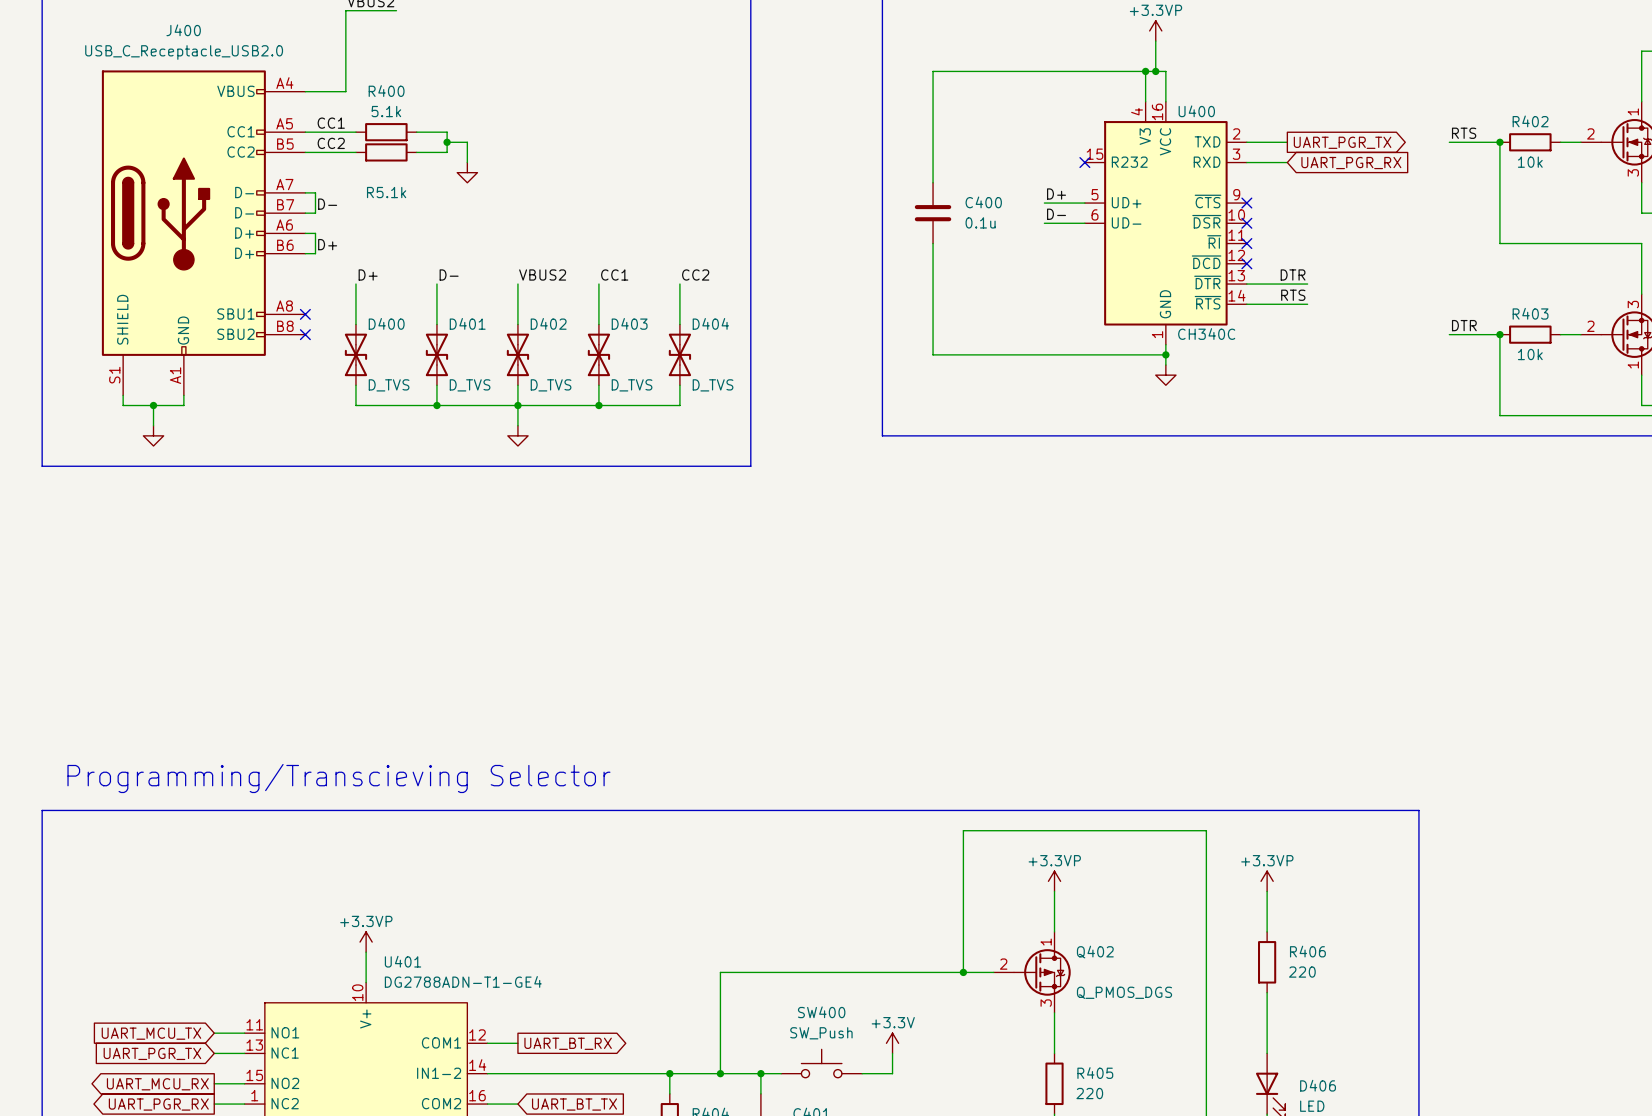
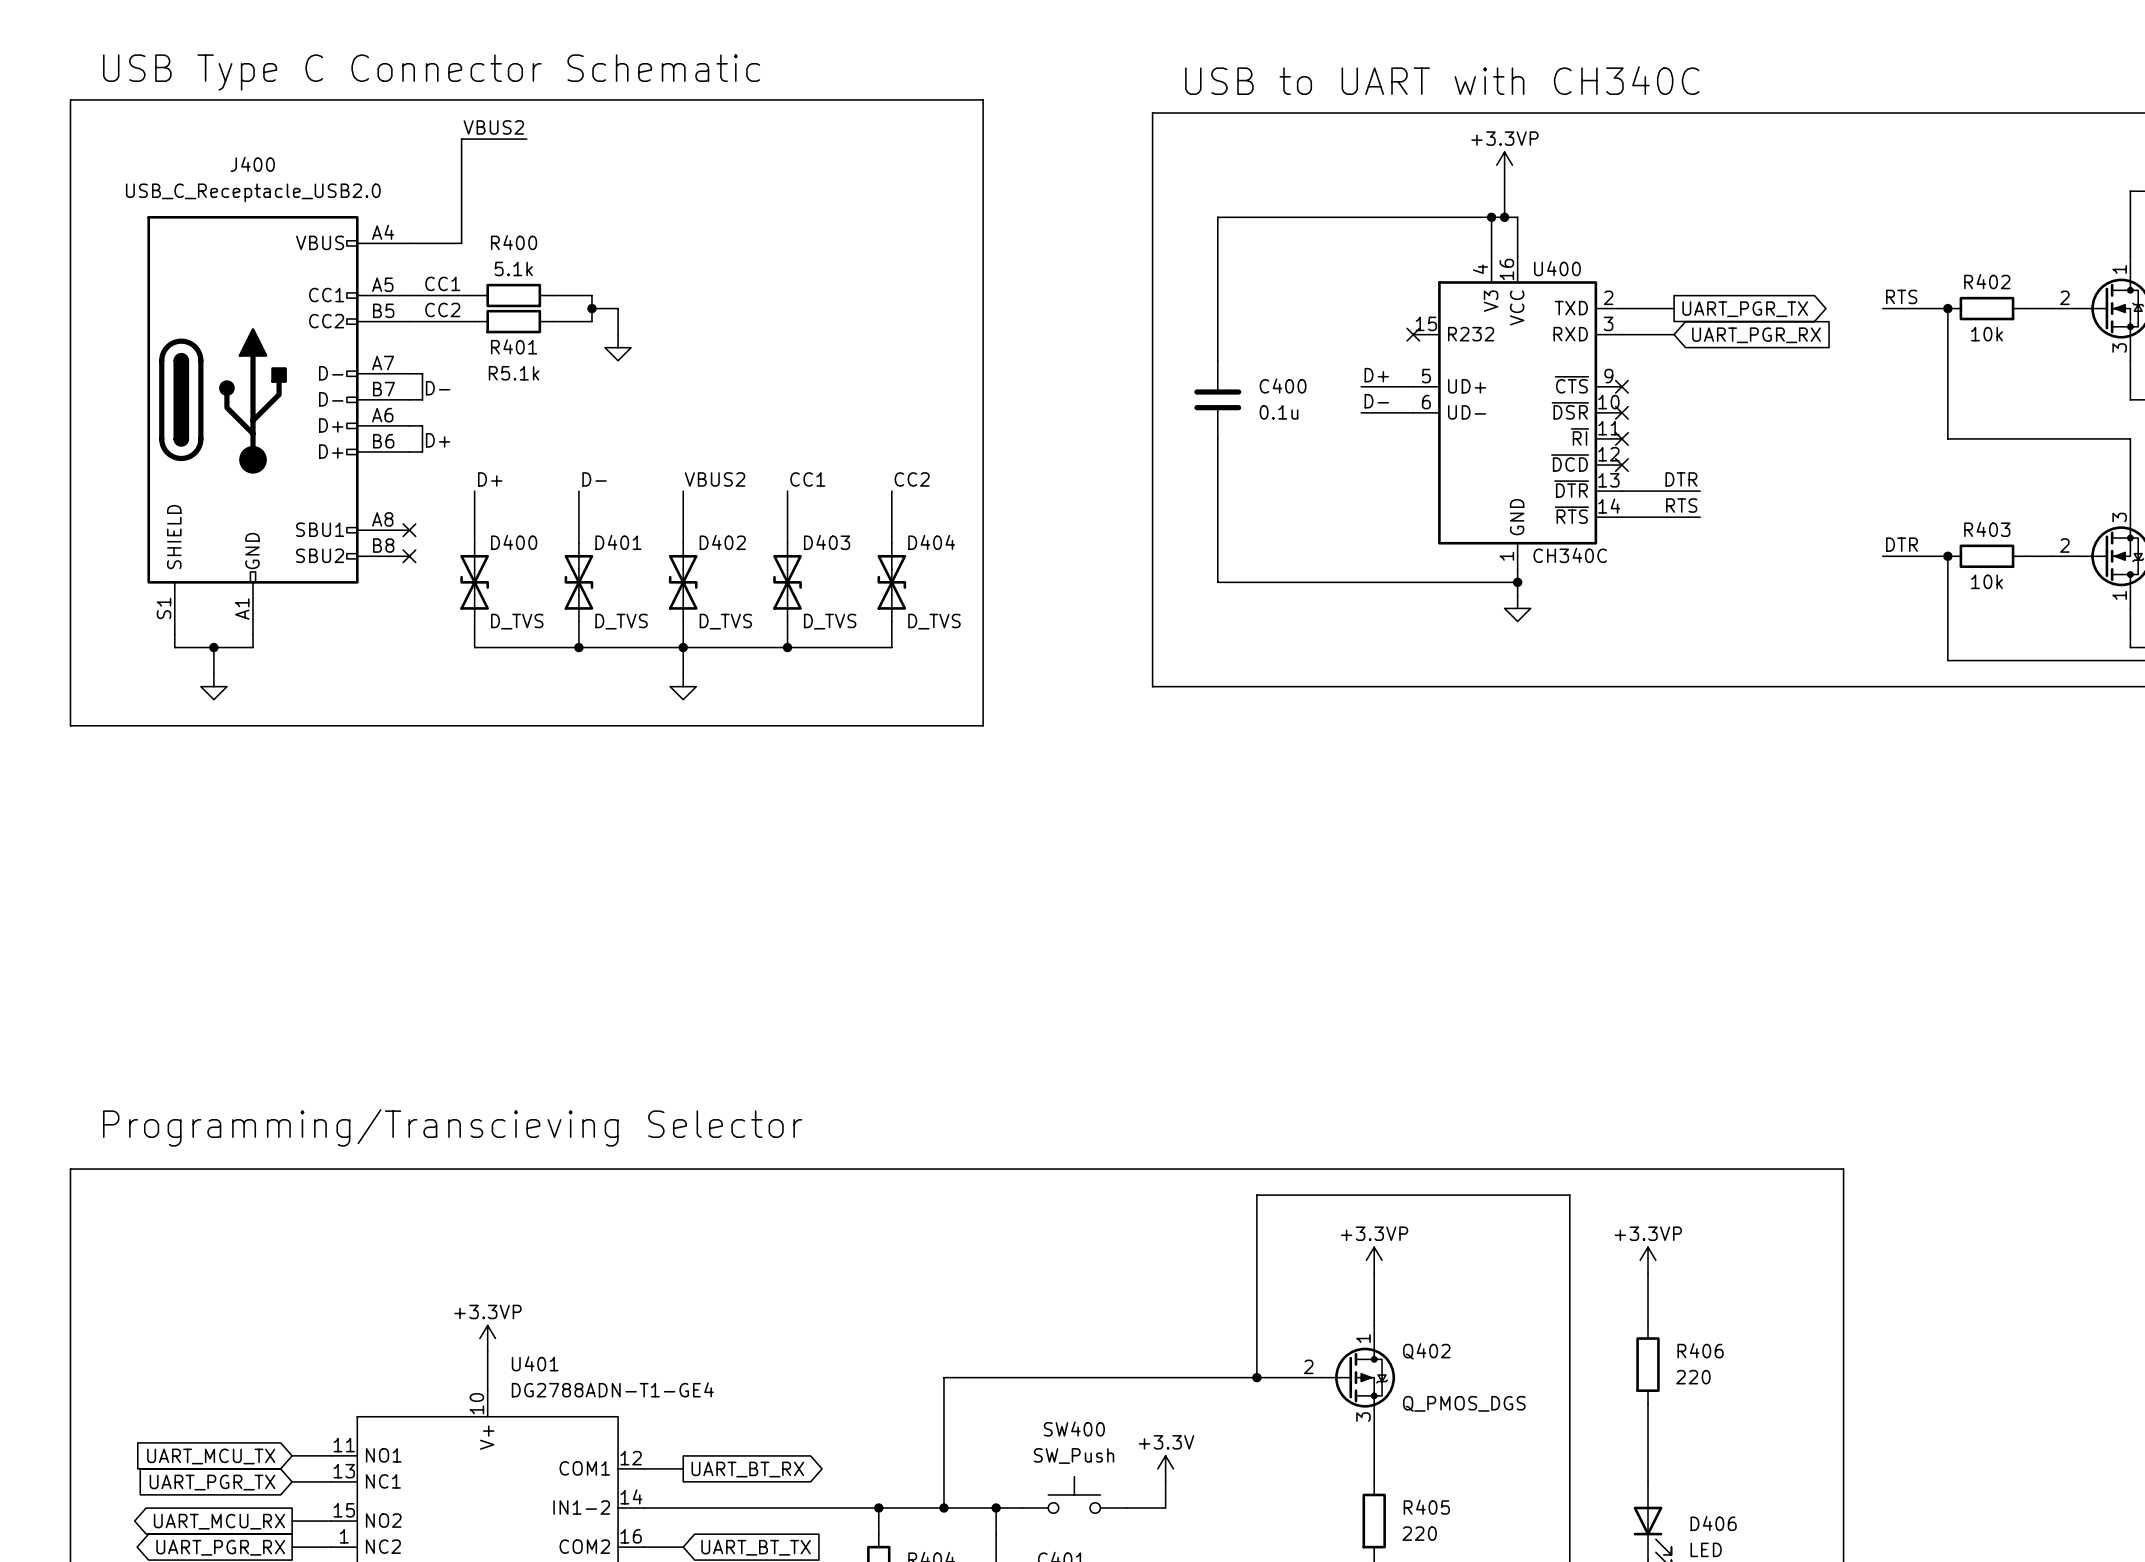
R5.1k value: none -> R401 (514, 346)

